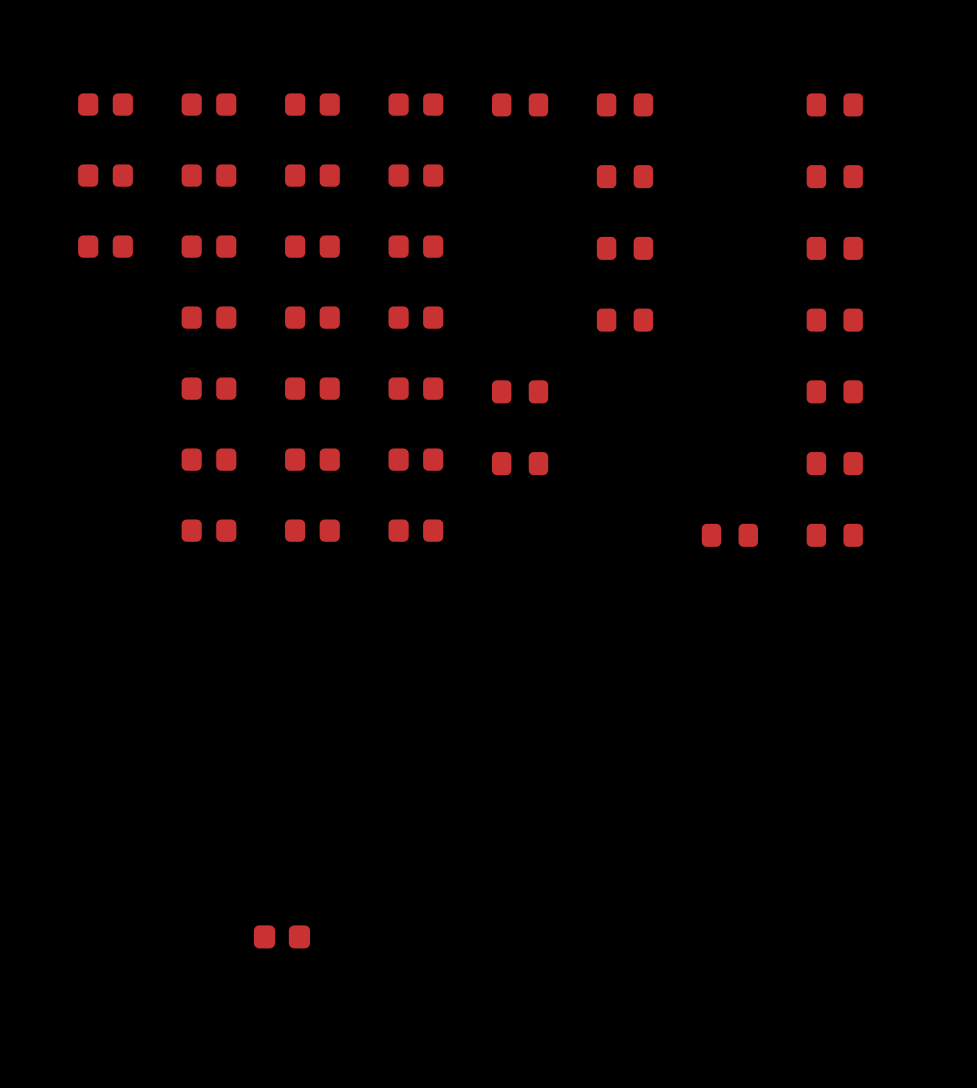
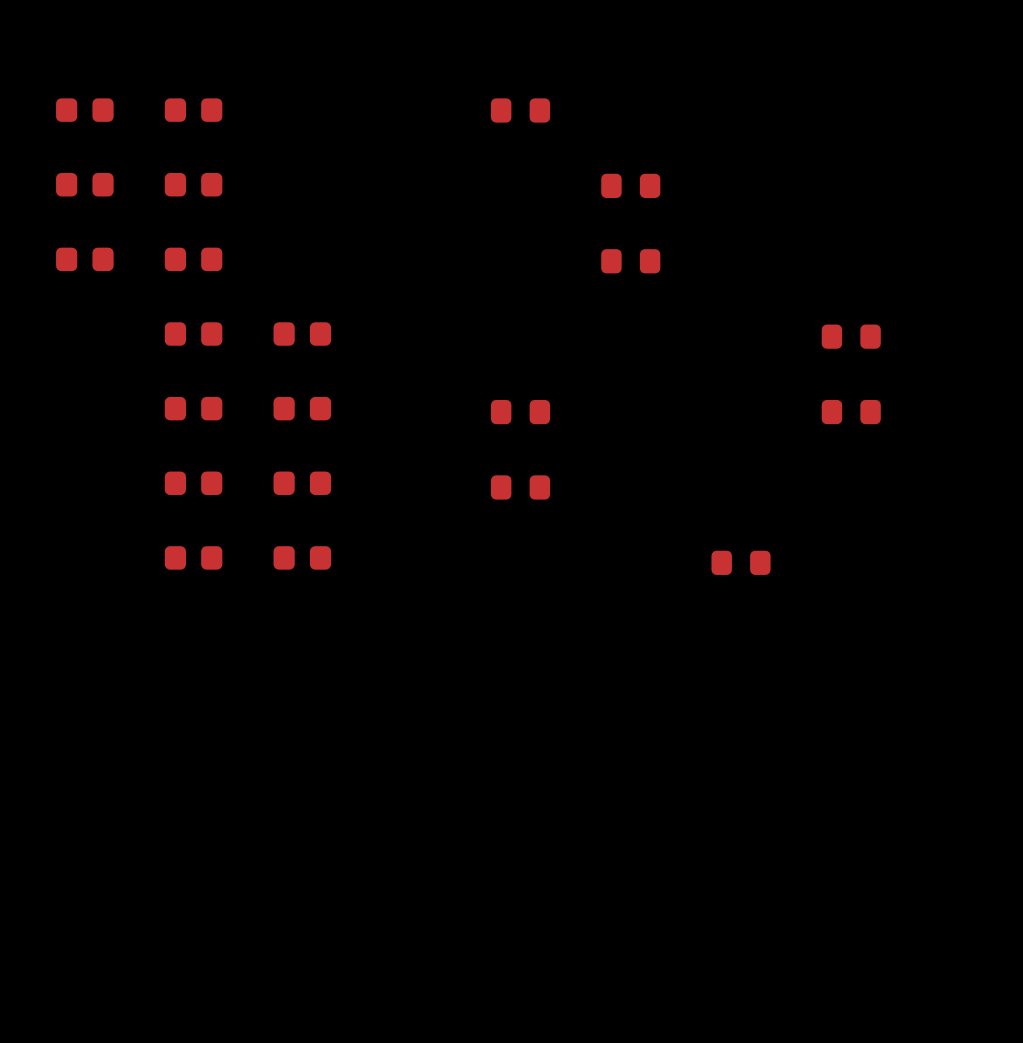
part: (312, 104) -> none
part: (415, 104) -> none
part: (624, 104) -> none
part: (834, 104) -> none
part: (312, 175) -> none
part: (415, 175) -> none
part: (834, 176) -> none
part: (312, 246) -> none
part: (415, 246) -> none
part: (834, 248) -> none
part: (415, 317) -> none
part: (624, 320) -> none
part: (415, 388) -> none
part: (415, 459) -> none
part: (834, 463) -> none
part: (415, 530) -> none
part: (834, 535) -> none
part: (281, 936) -> none

